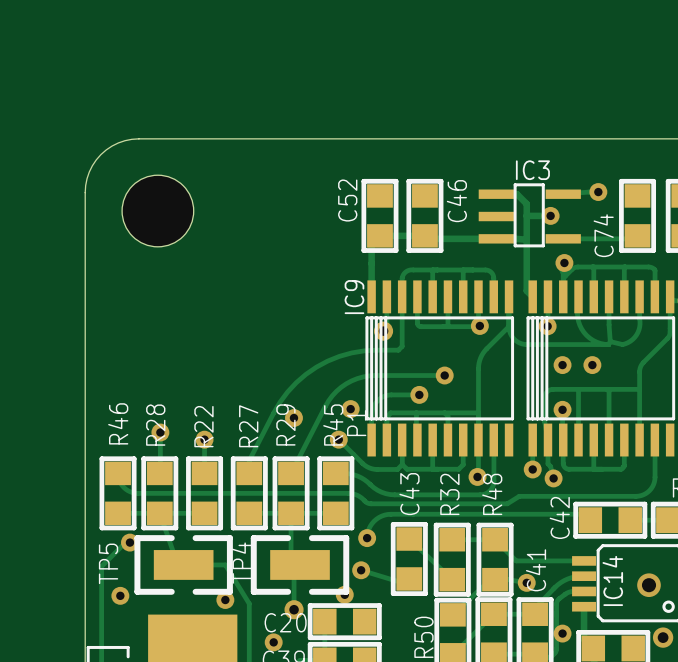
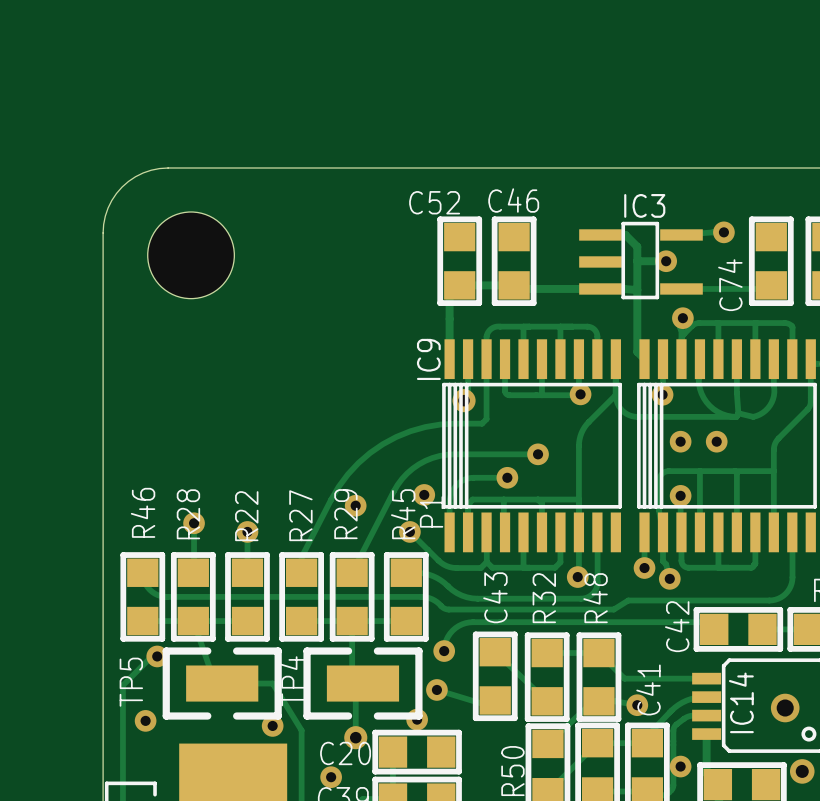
C52 name rotation: 0° (347, 200) -> 90° clockwise (434, 202)
C46 name rotation: 0° (456, 201) -> 90° clockwise (513, 200)

